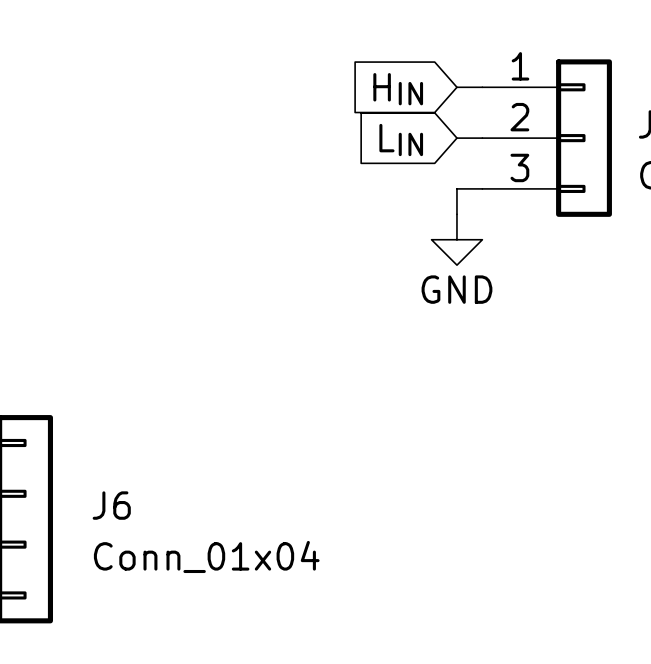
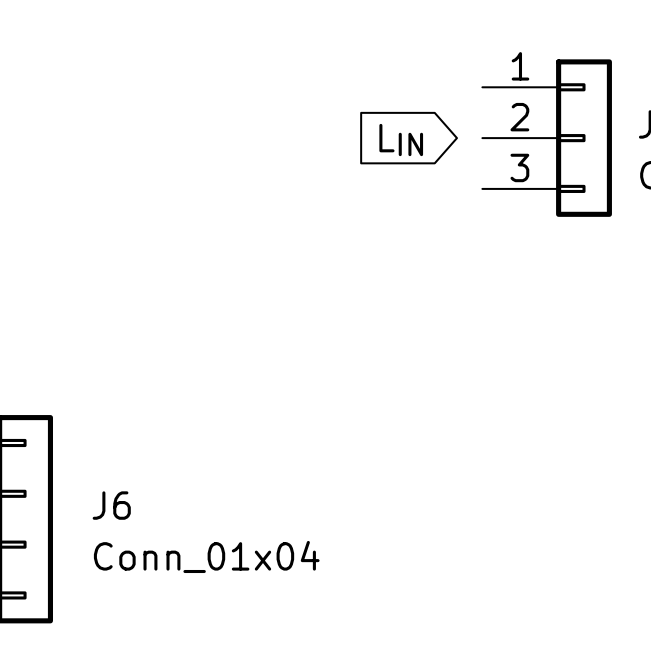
wire: (456, 87) (482, 87) -> none
global label: HIN (398, 89) -> none
wire: (456, 138) (482, 138) -> none
wire: (482, 188) (456, 188) (456, 214) -> none
power symbol: GND (456, 239) -> none

